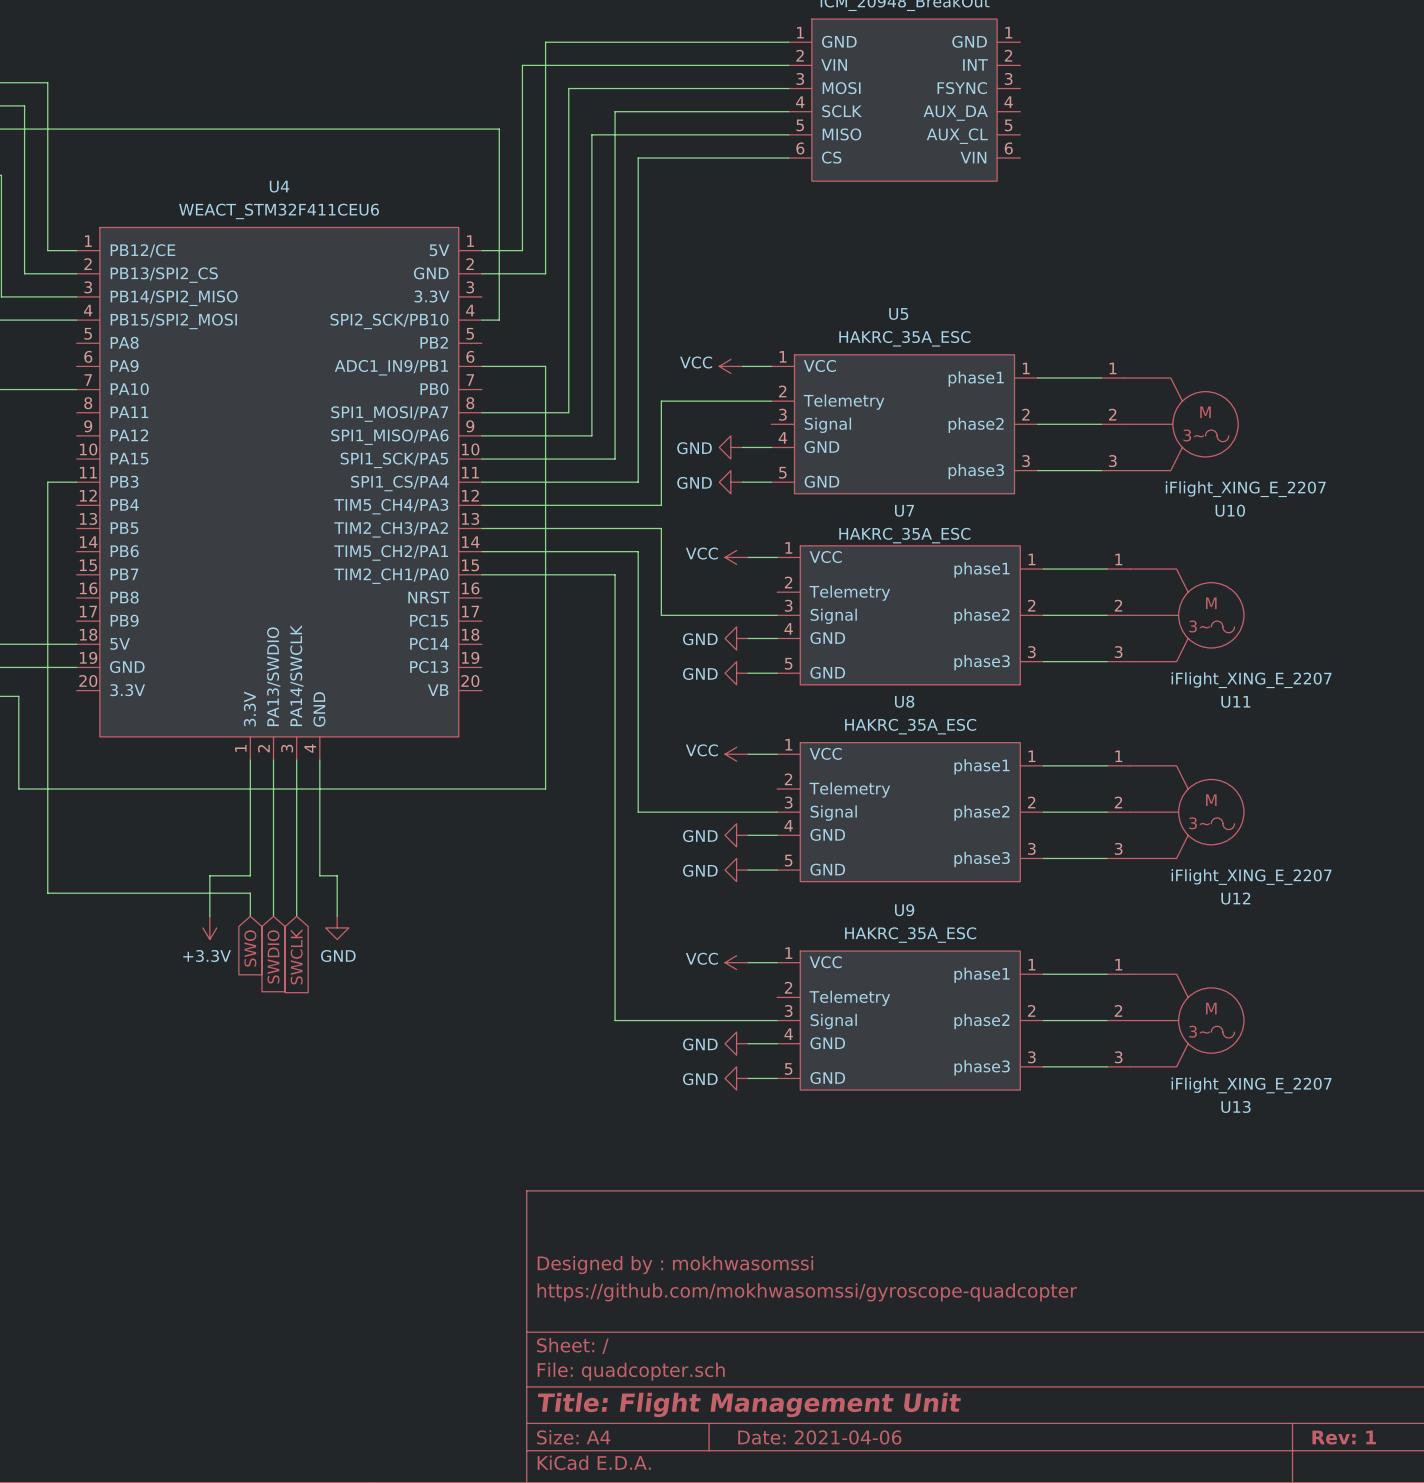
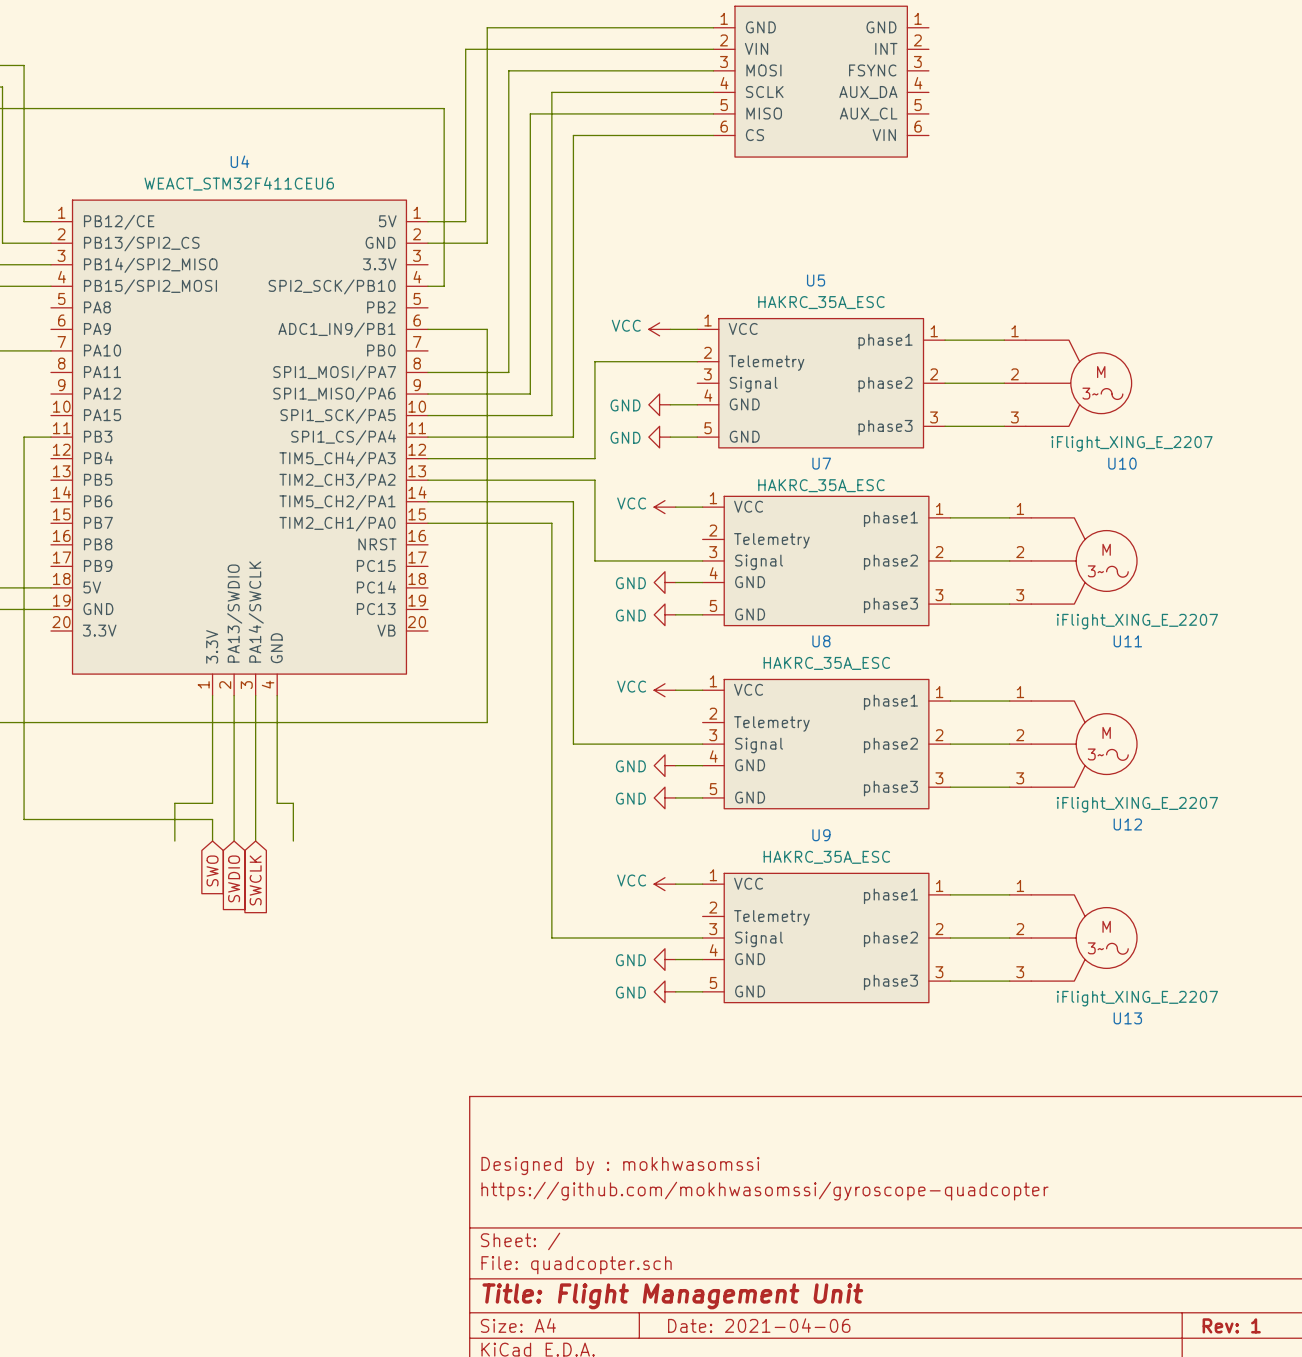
power symbol: +3.3V (209, 927) -> none
power symbol: GND (337, 927) -> none

